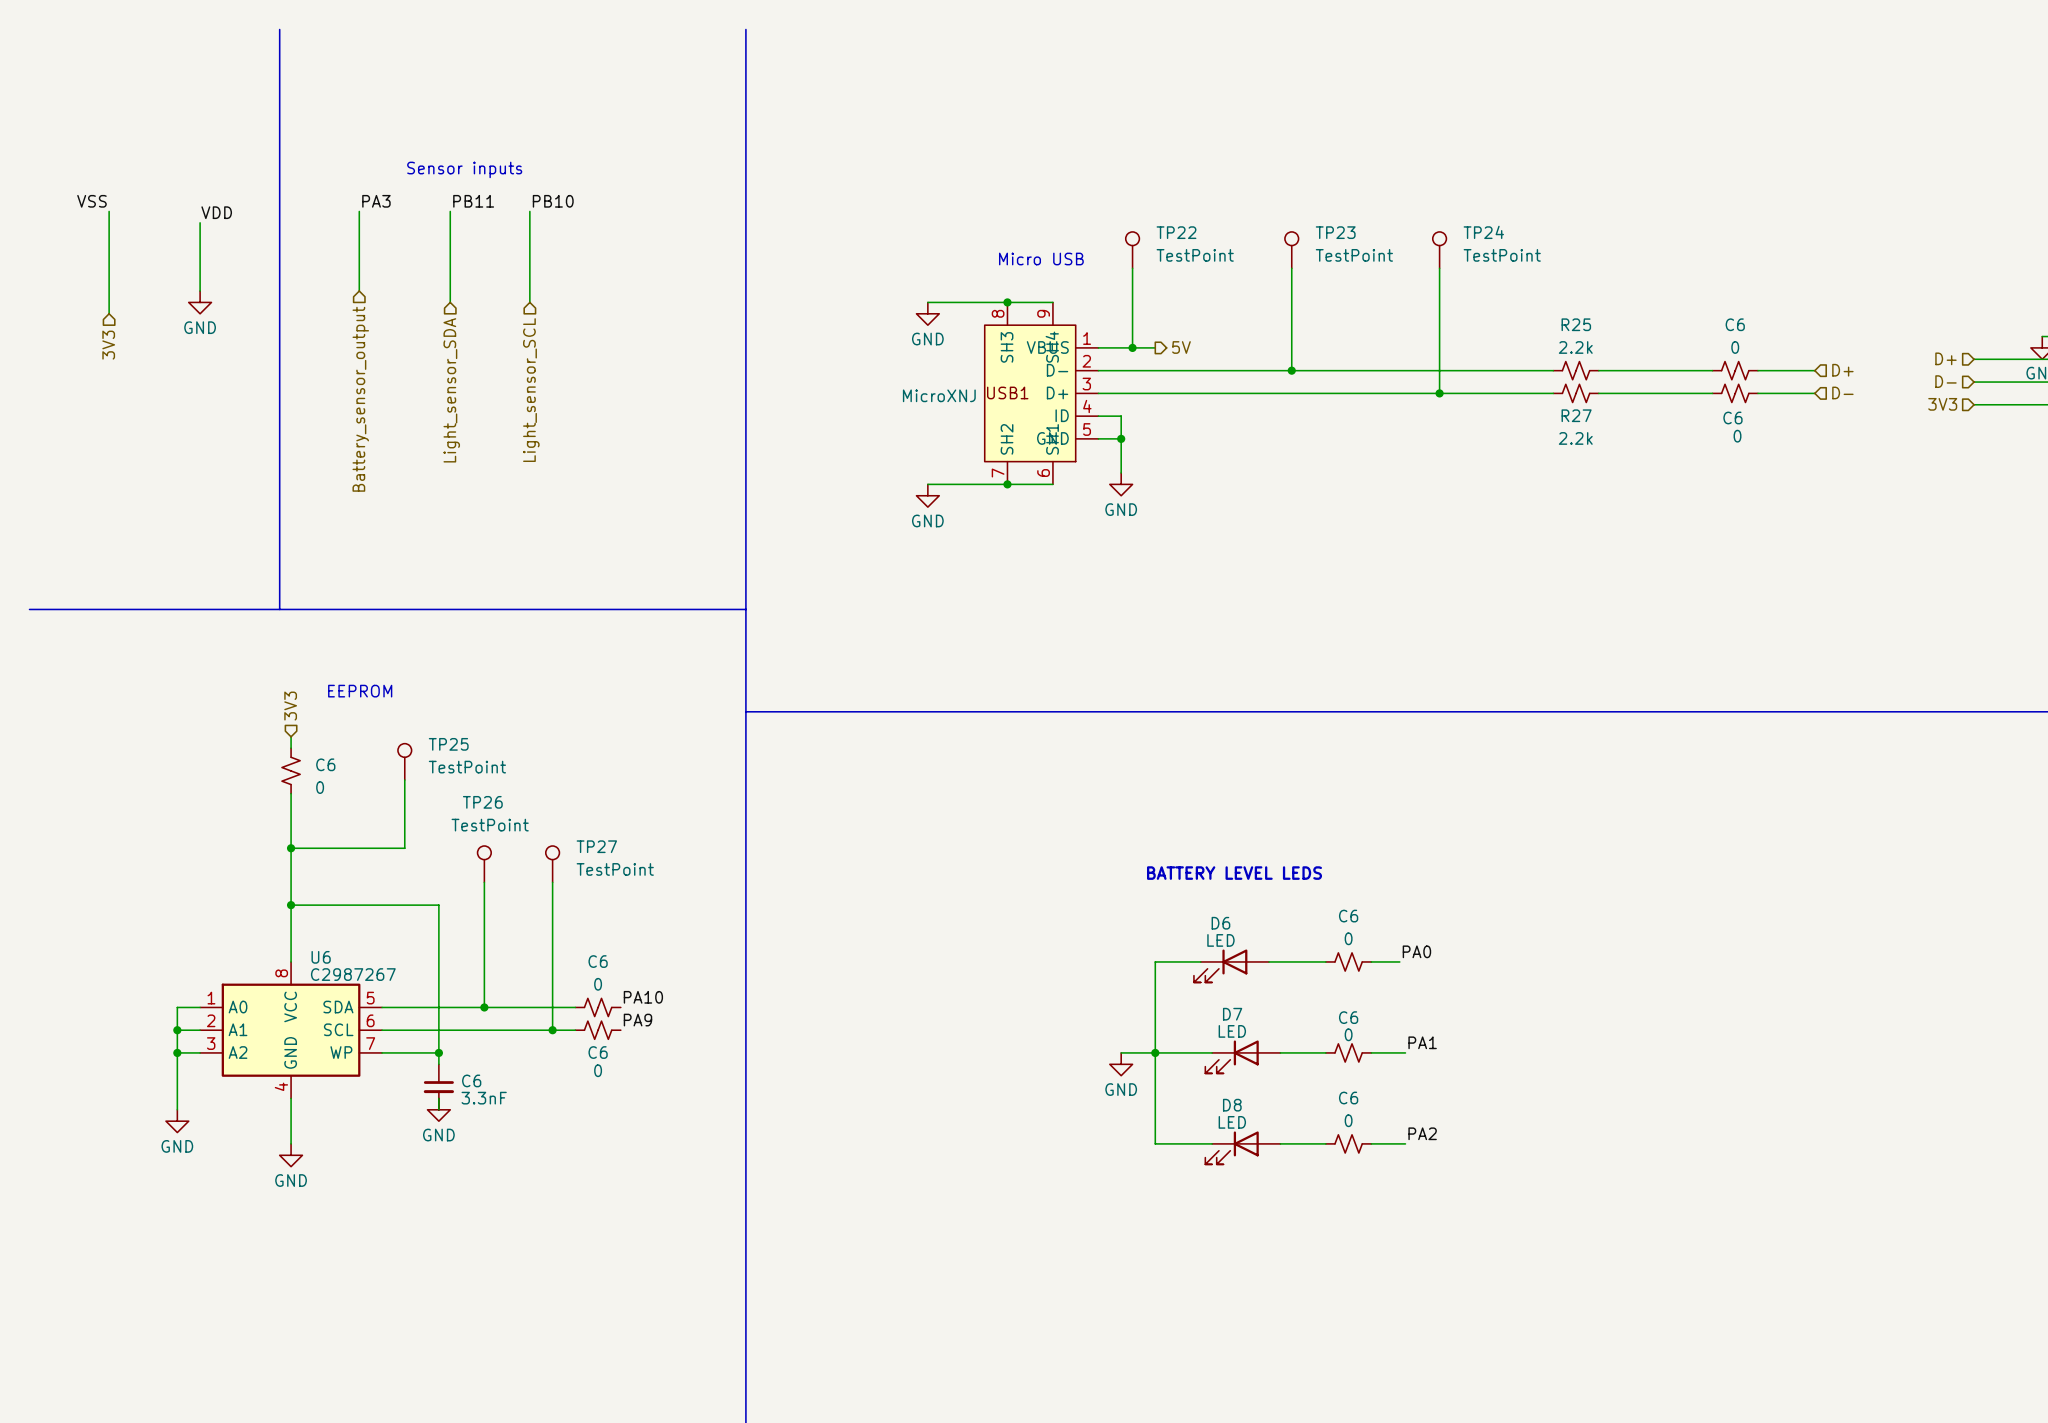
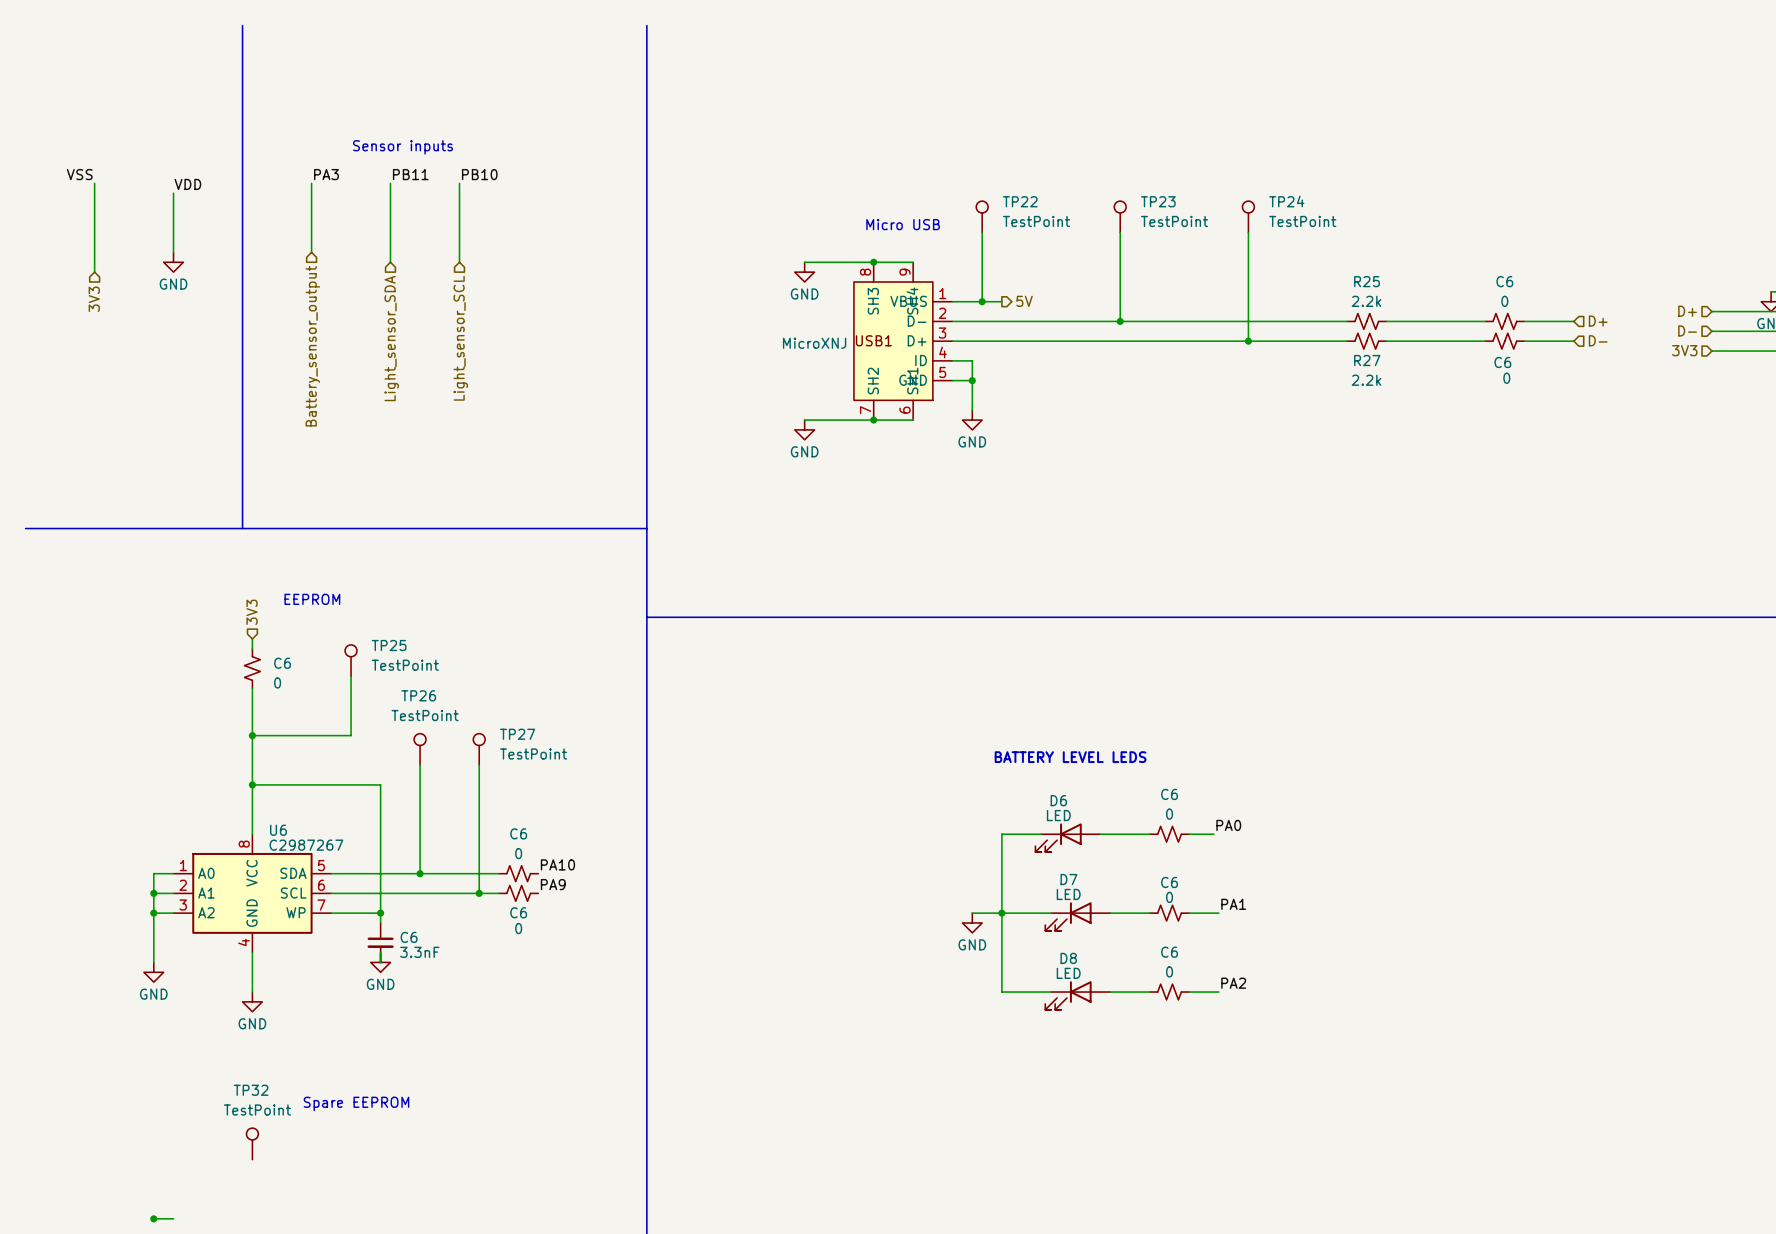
text: none -> Spare EEPROM (356, 1103)
TP32: none -> TestPoint (252, 1143)
wire: none -> (153, 1218) (173, 1218)
junction: none -> (153, 1218)

